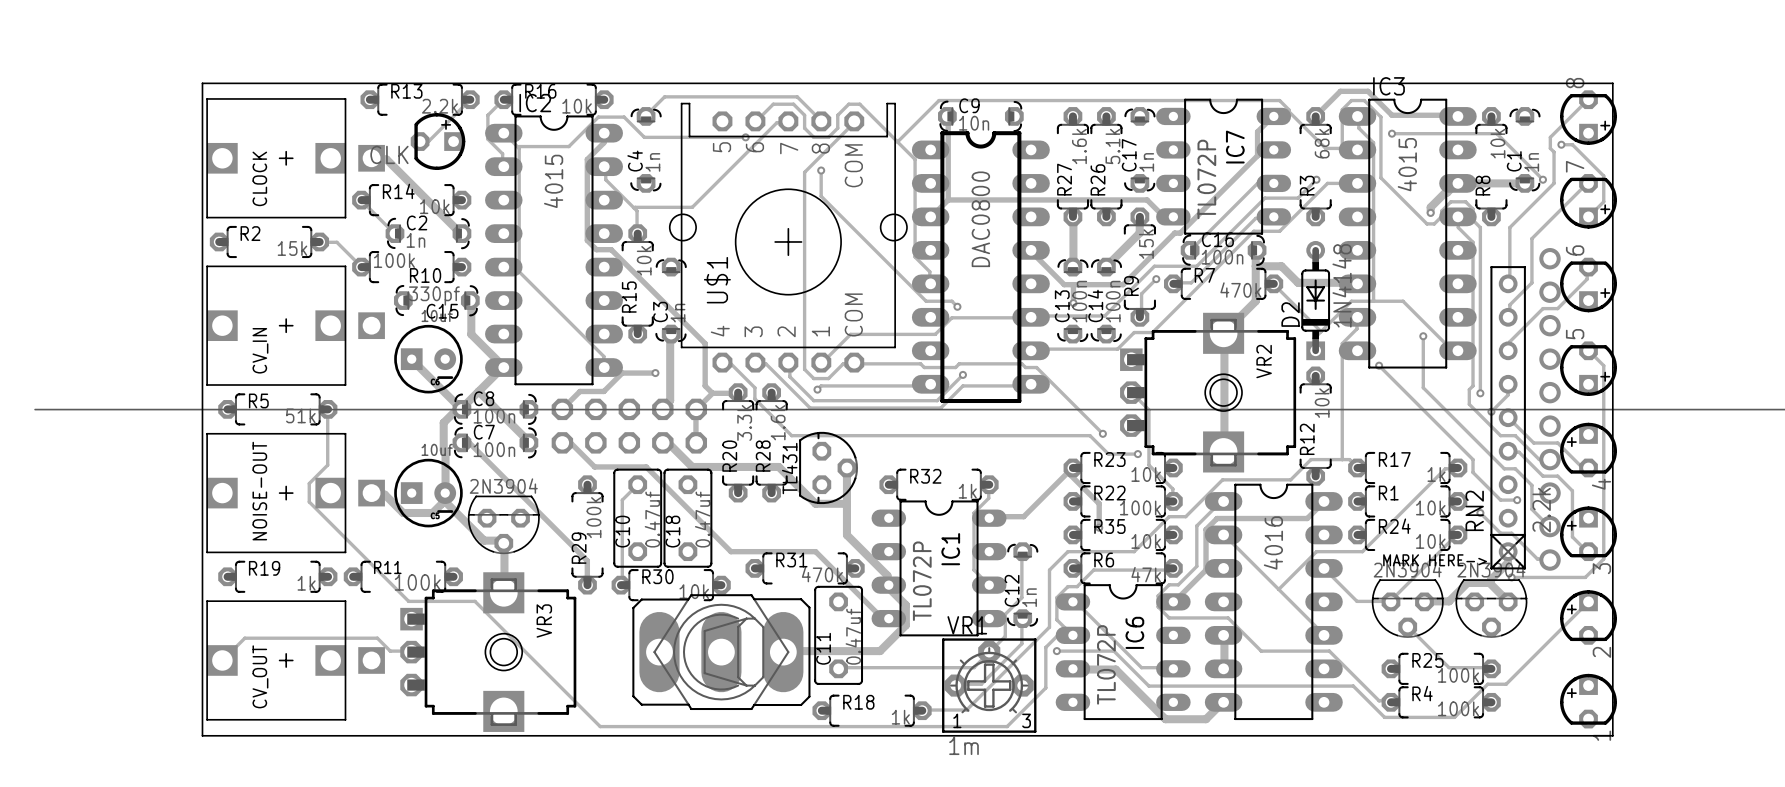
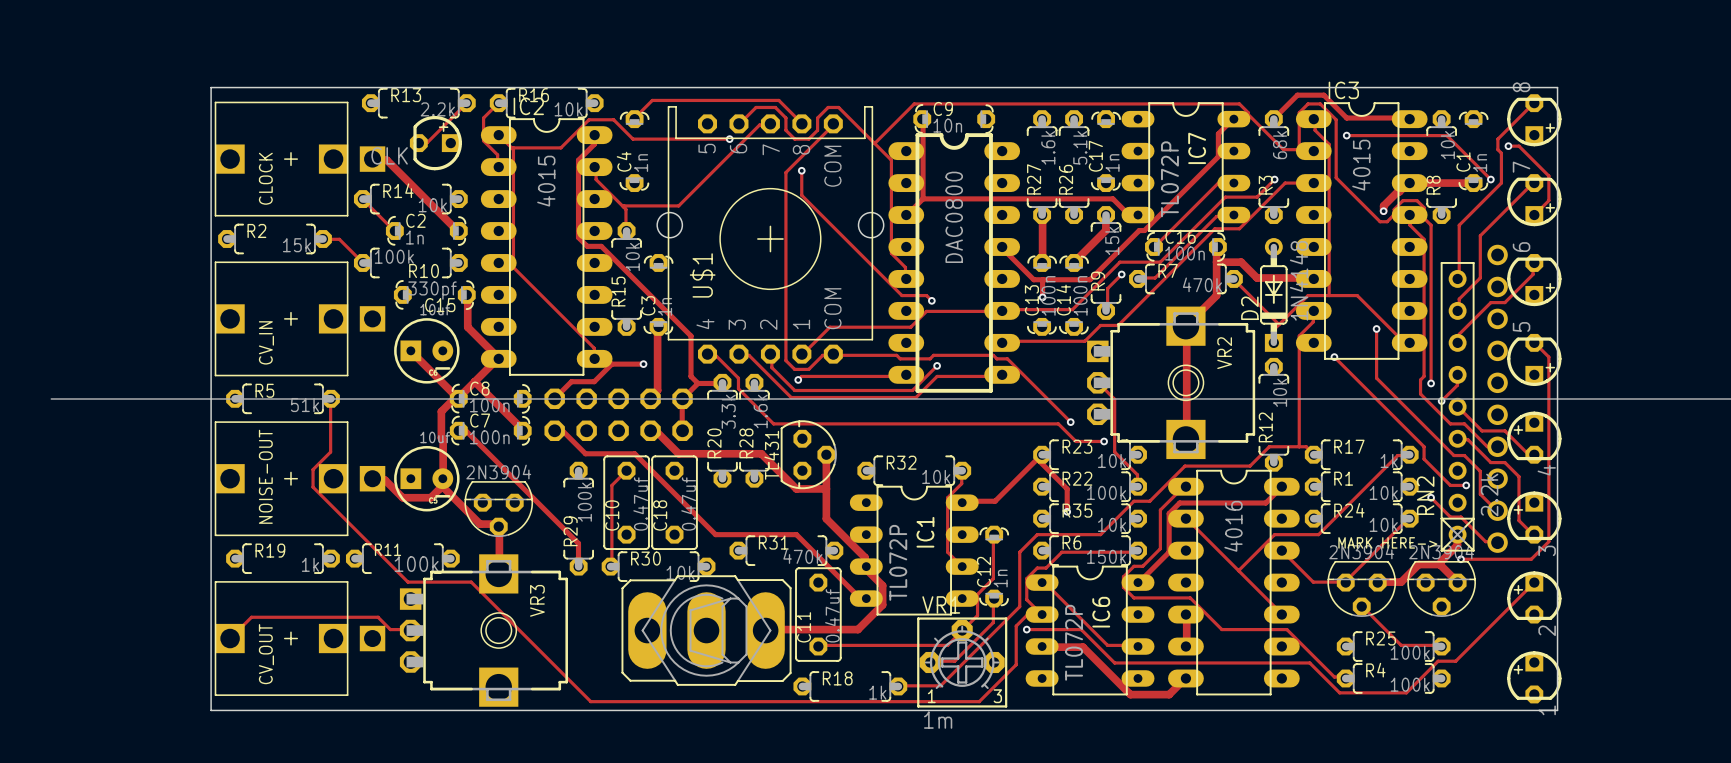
R32 value: 1k (967, 491) -> 10k (936, 476)
R6 value: 47k (1146, 574) -> 150k (1106, 556)

